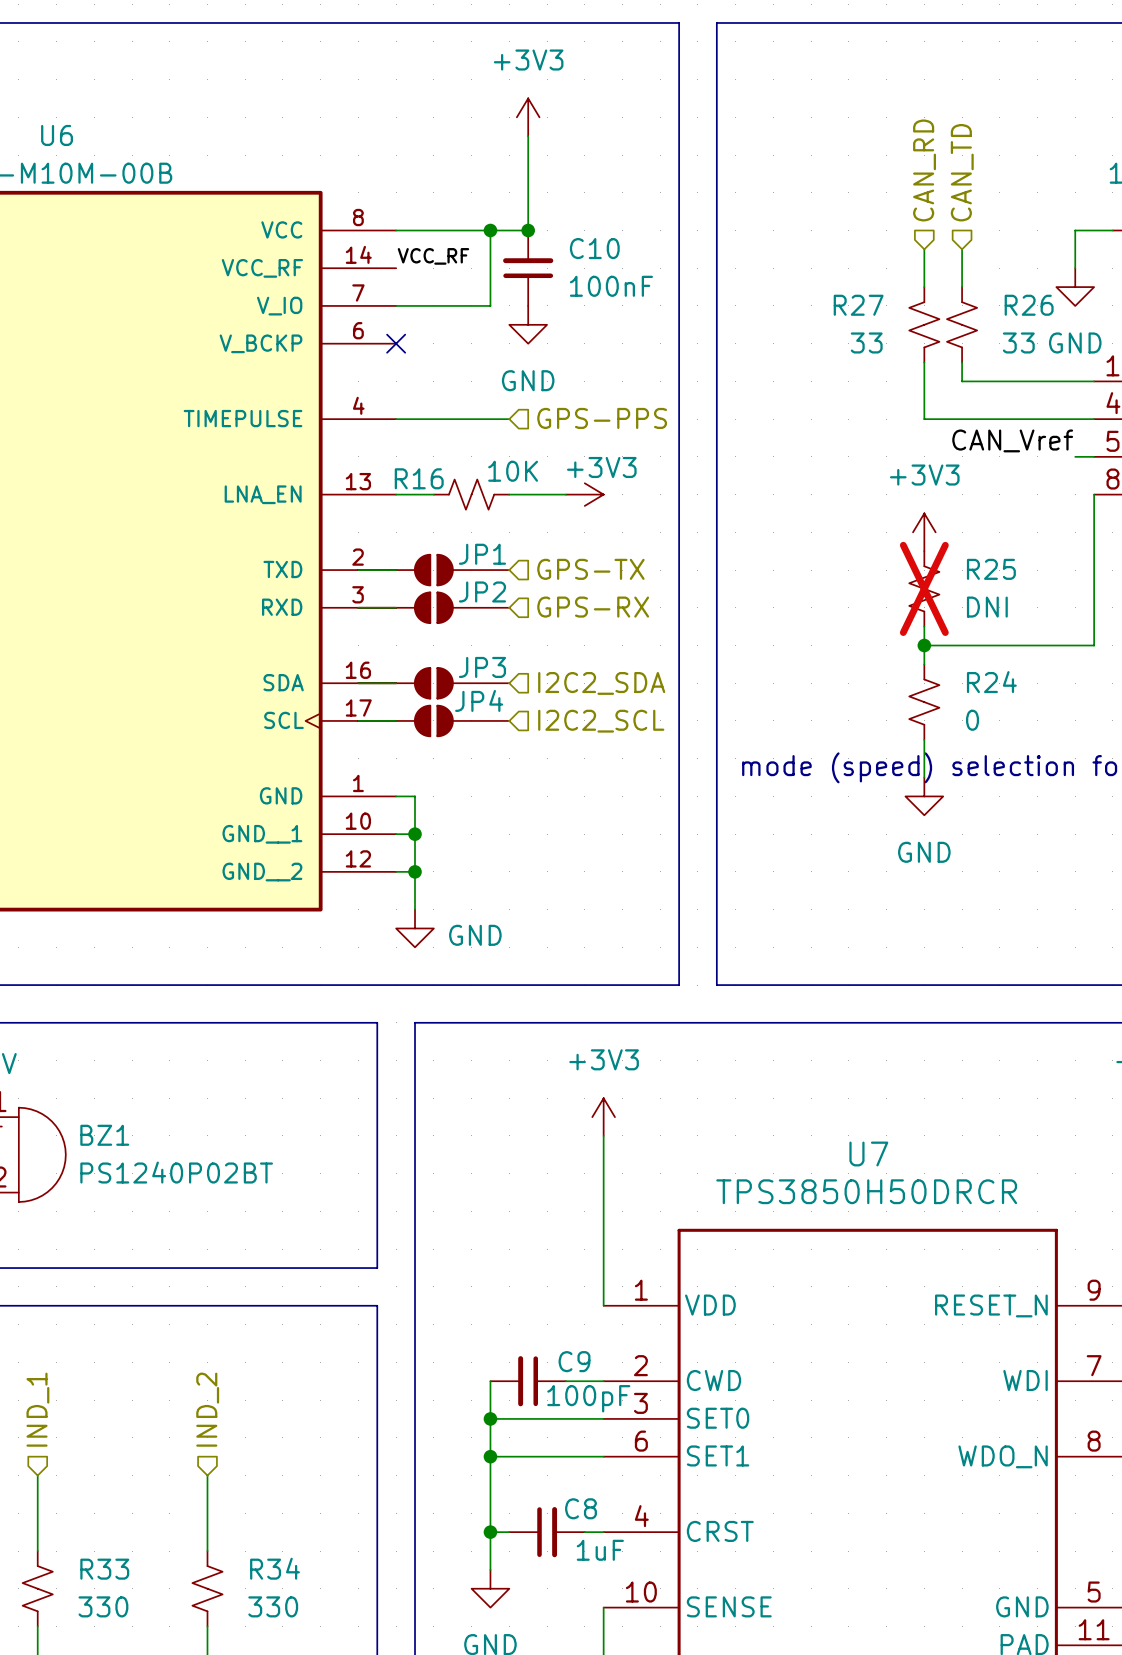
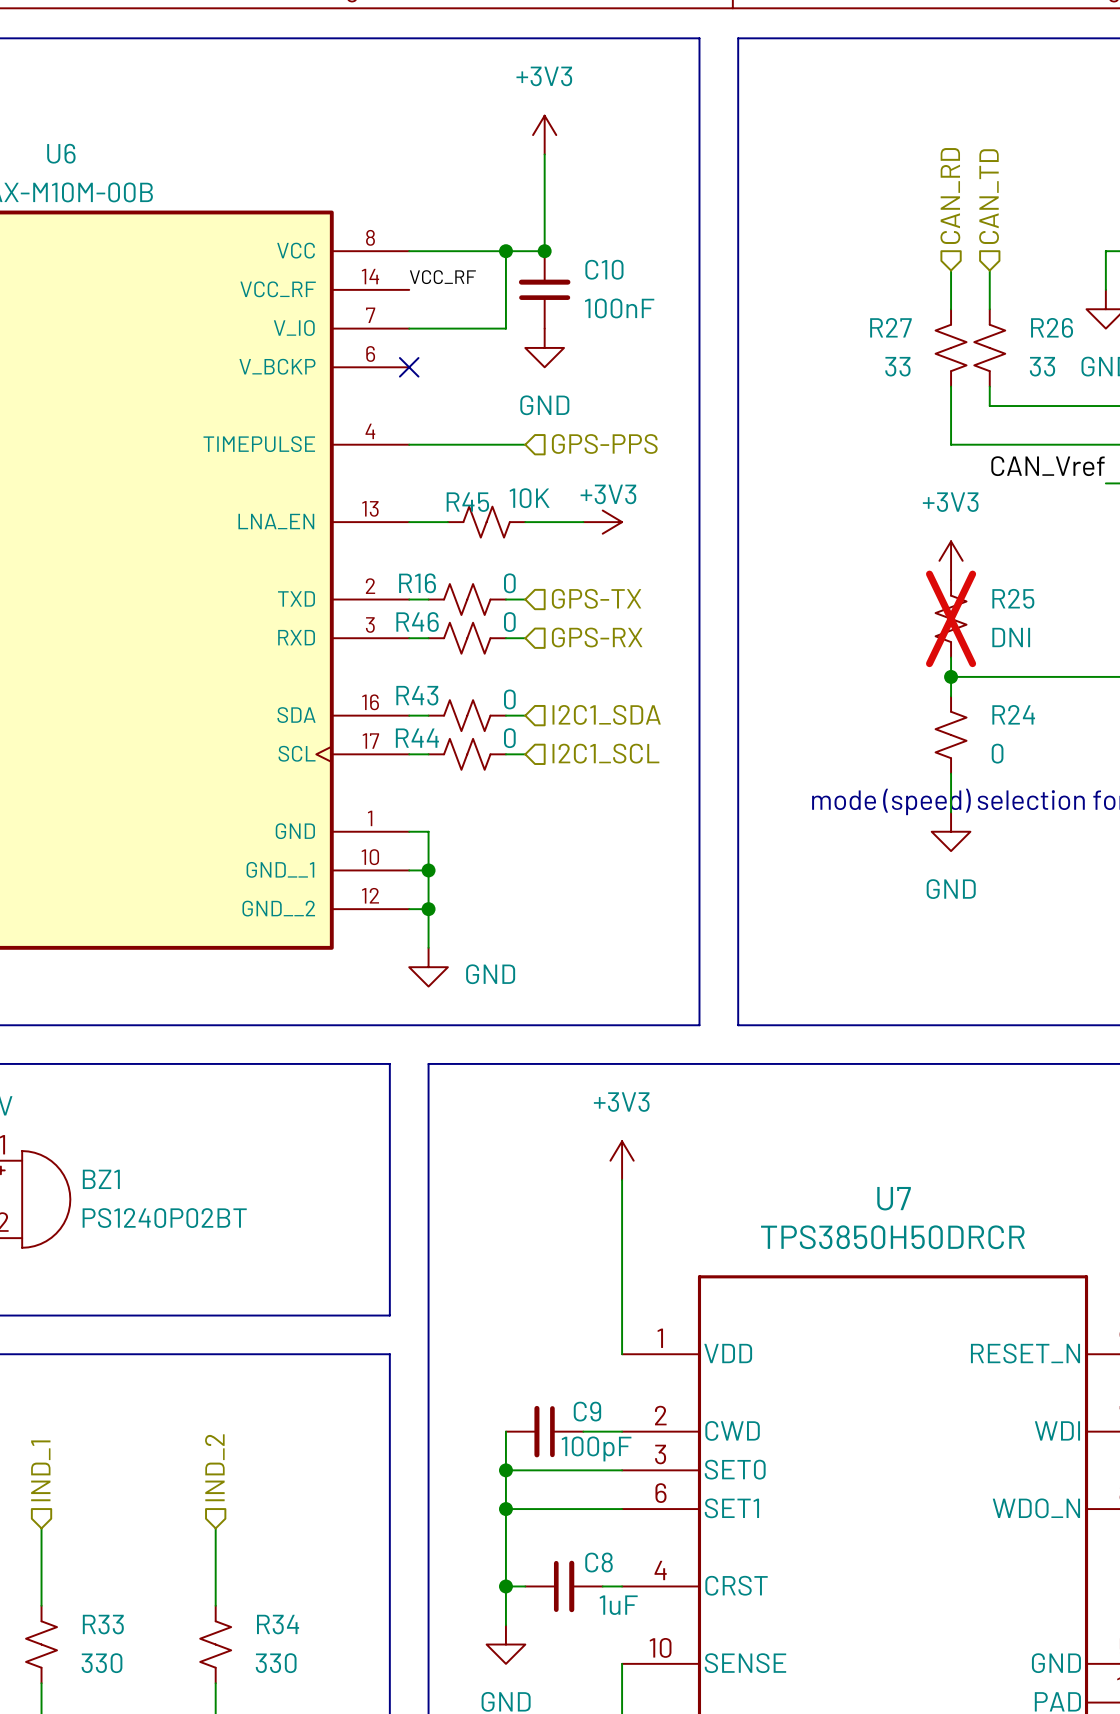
R16 name position: R16 (419, 478) -> R16 (417, 583)
JP1: (433, 570) -> none
R45: none -> 0 (467, 599)
JP2: (433, 607) -> none
R46: none -> 0 (467, 638)
JP3: (433, 683) -> none
R43: none -> 0 (467, 715)
hierarchical label: I2C2_SDA (601, 683) -> I2C1_SDA (606, 714)
JP4: (433, 720) -> none
R44: none -> 0 (467, 754)
hierarchical label: I2C2_SCL (601, 721) -> I2C1_SCL (605, 753)

